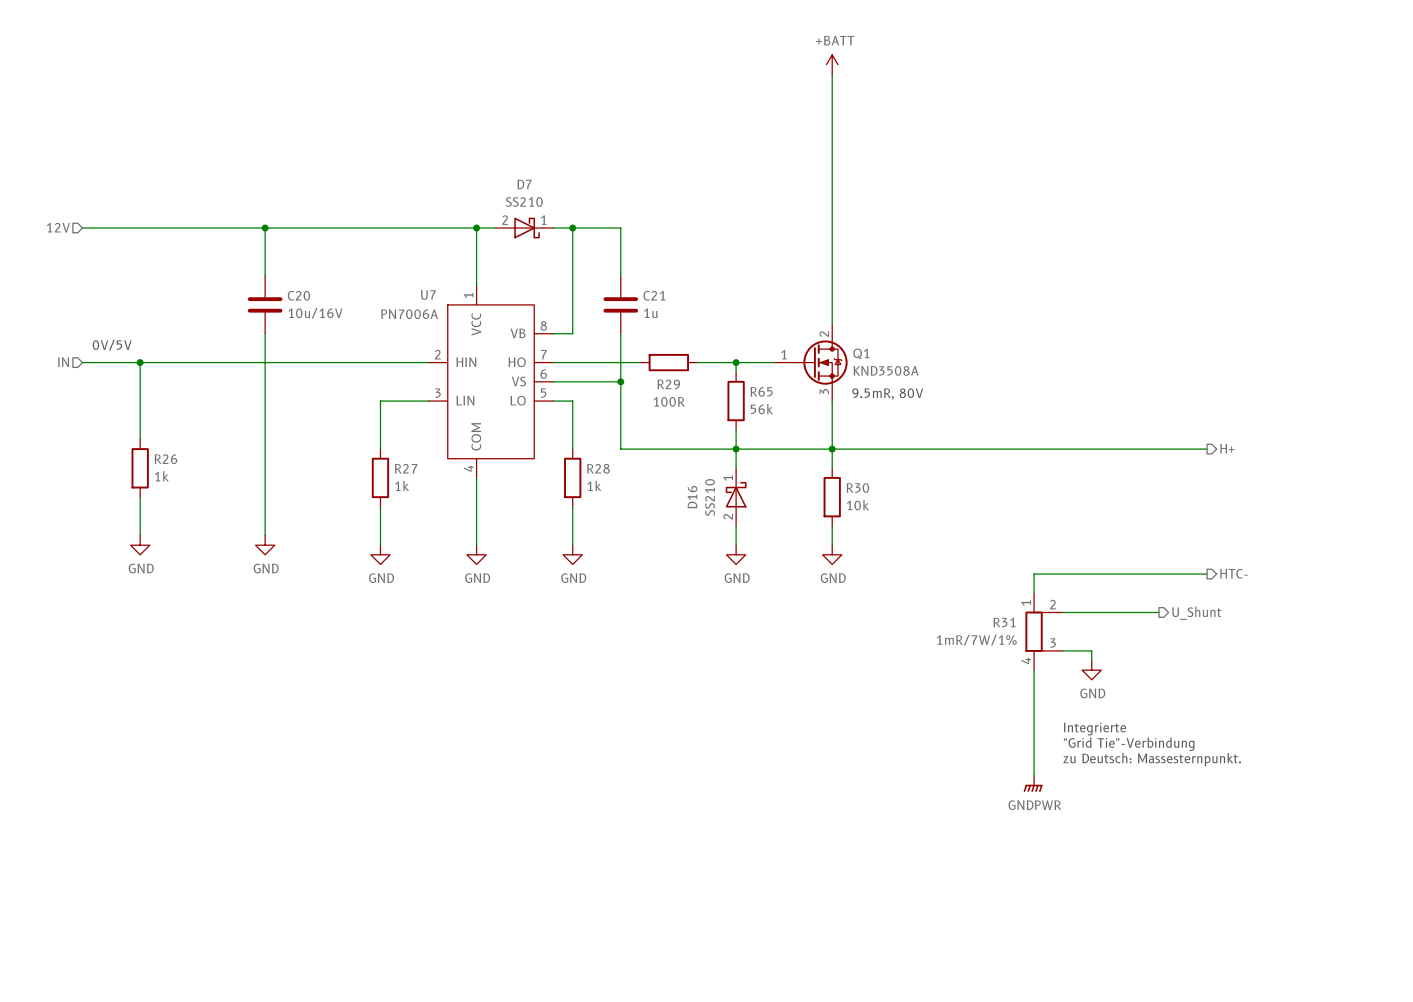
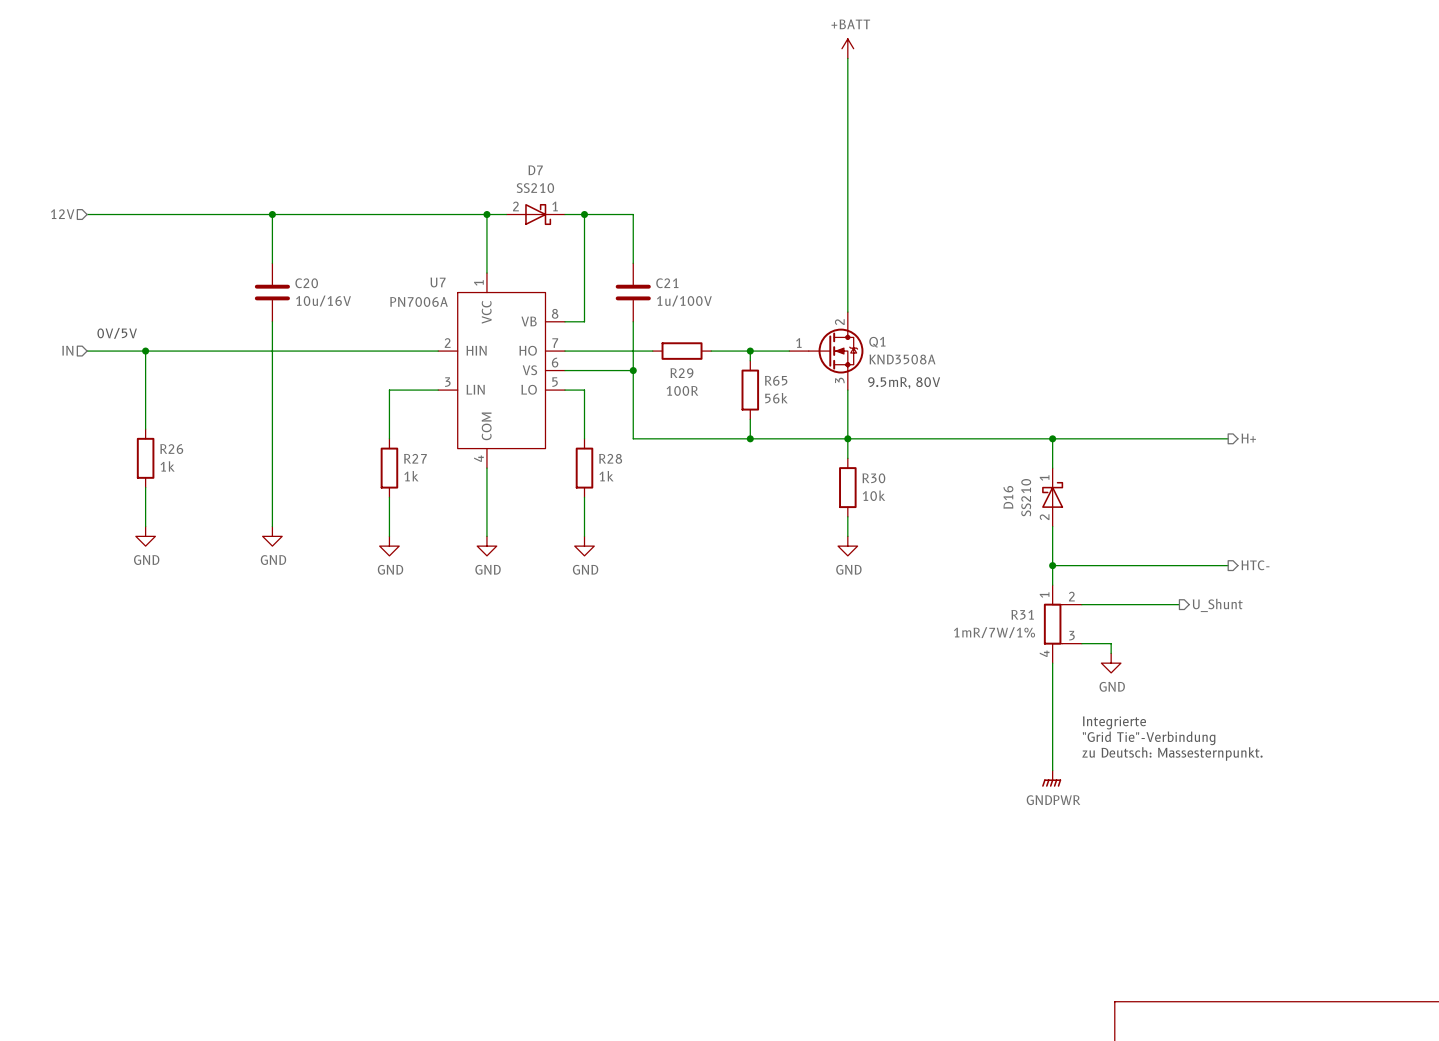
C21 value: 1u (650, 313) -> 1u/100V (684, 301)
wire: (736, 449) (736, 468) -> none
wire: none -> (1052, 438) (1052, 468)
junction: none -> (1052, 438)
D16 position: (736, 497) -> (1052, 497)
wire: (736, 525) (736, 545) -> none
wire: none -> (1052, 526) (1052, 565)
power symbol: GND (736, 554) -> none
junction: none -> (1052, 565)

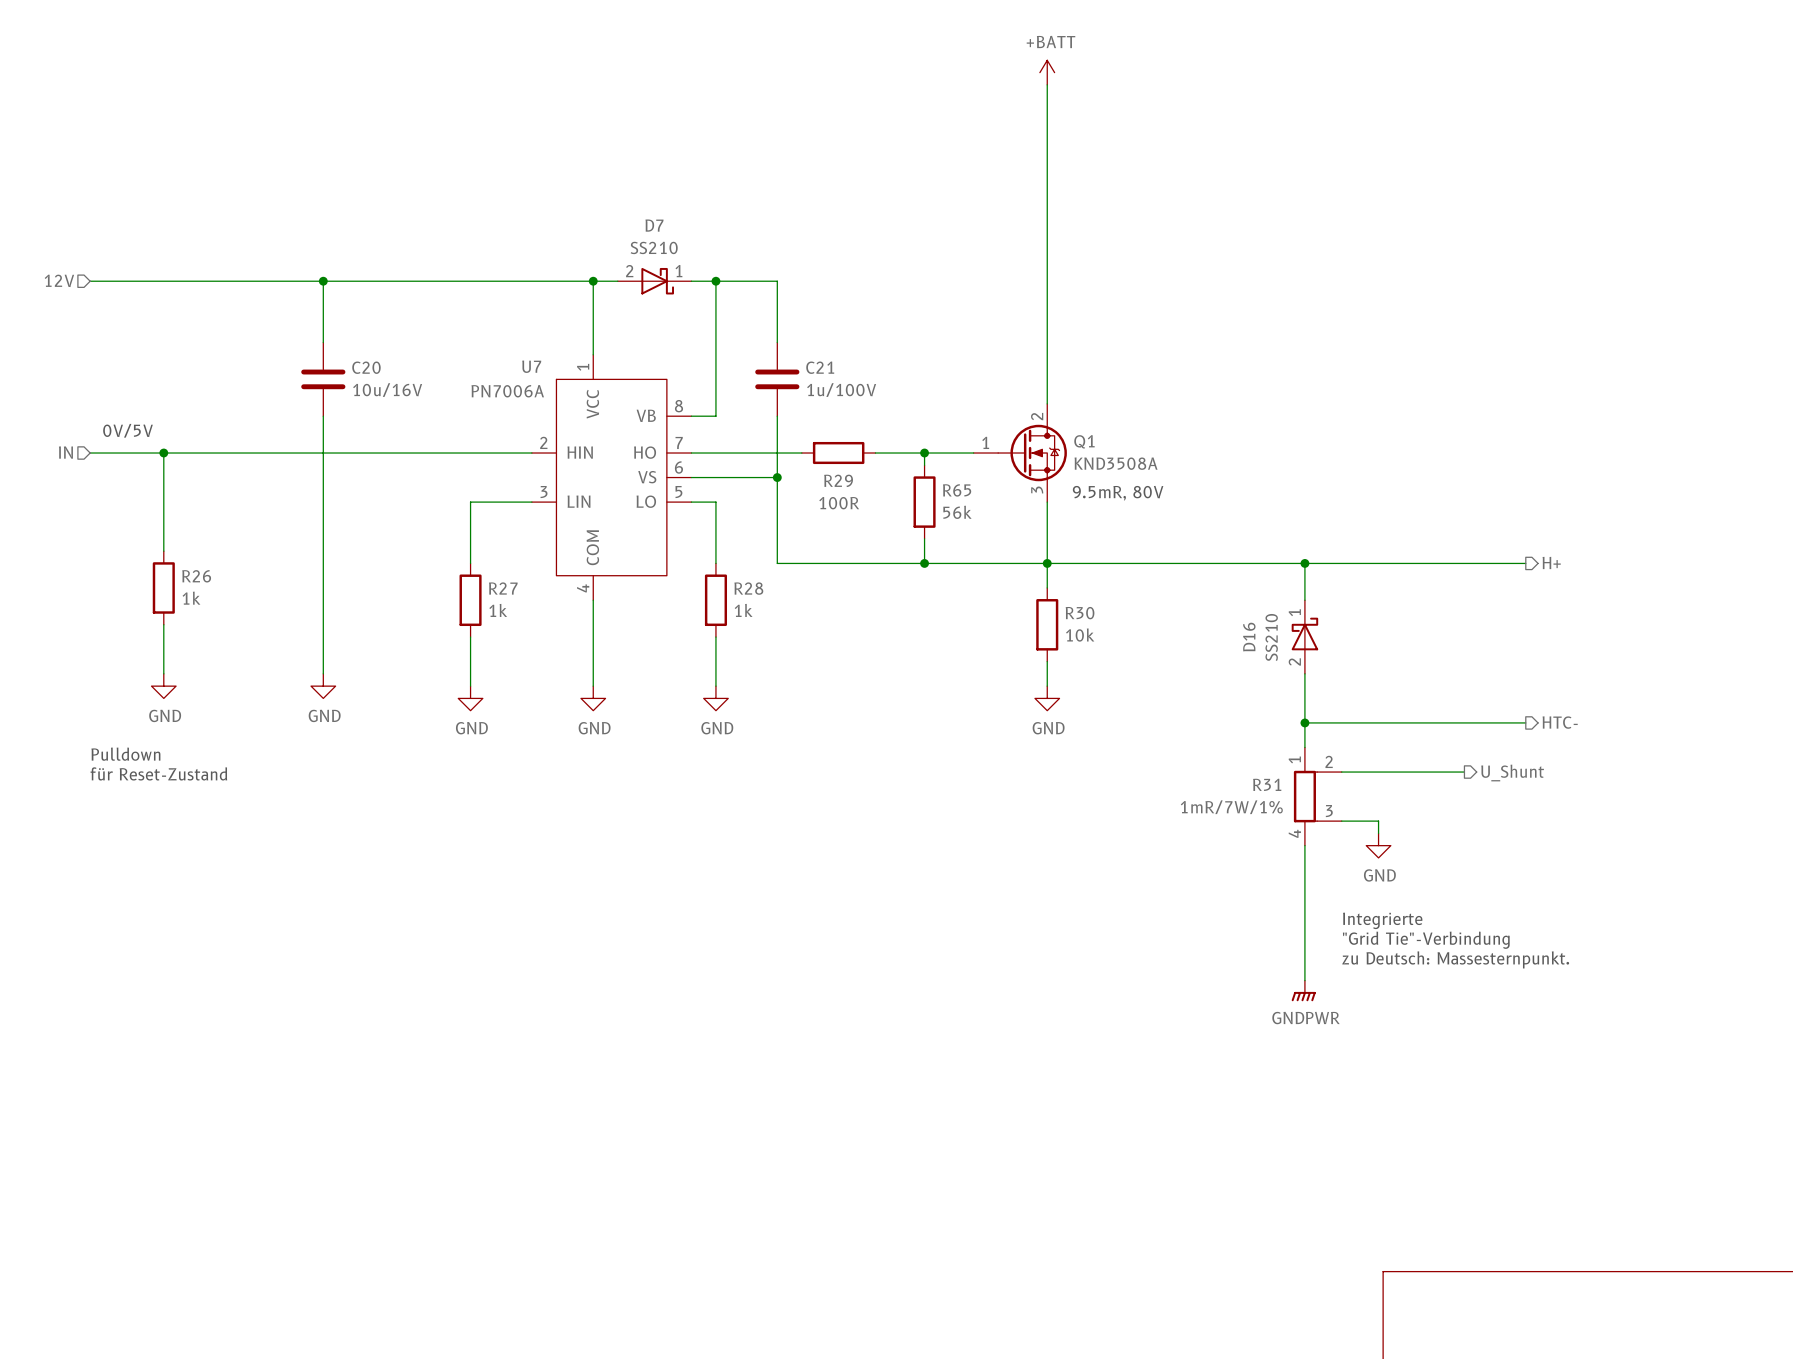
text: none -> Pulldown (125, 754)
text: none -> für Reset-Zustand (158, 773)

